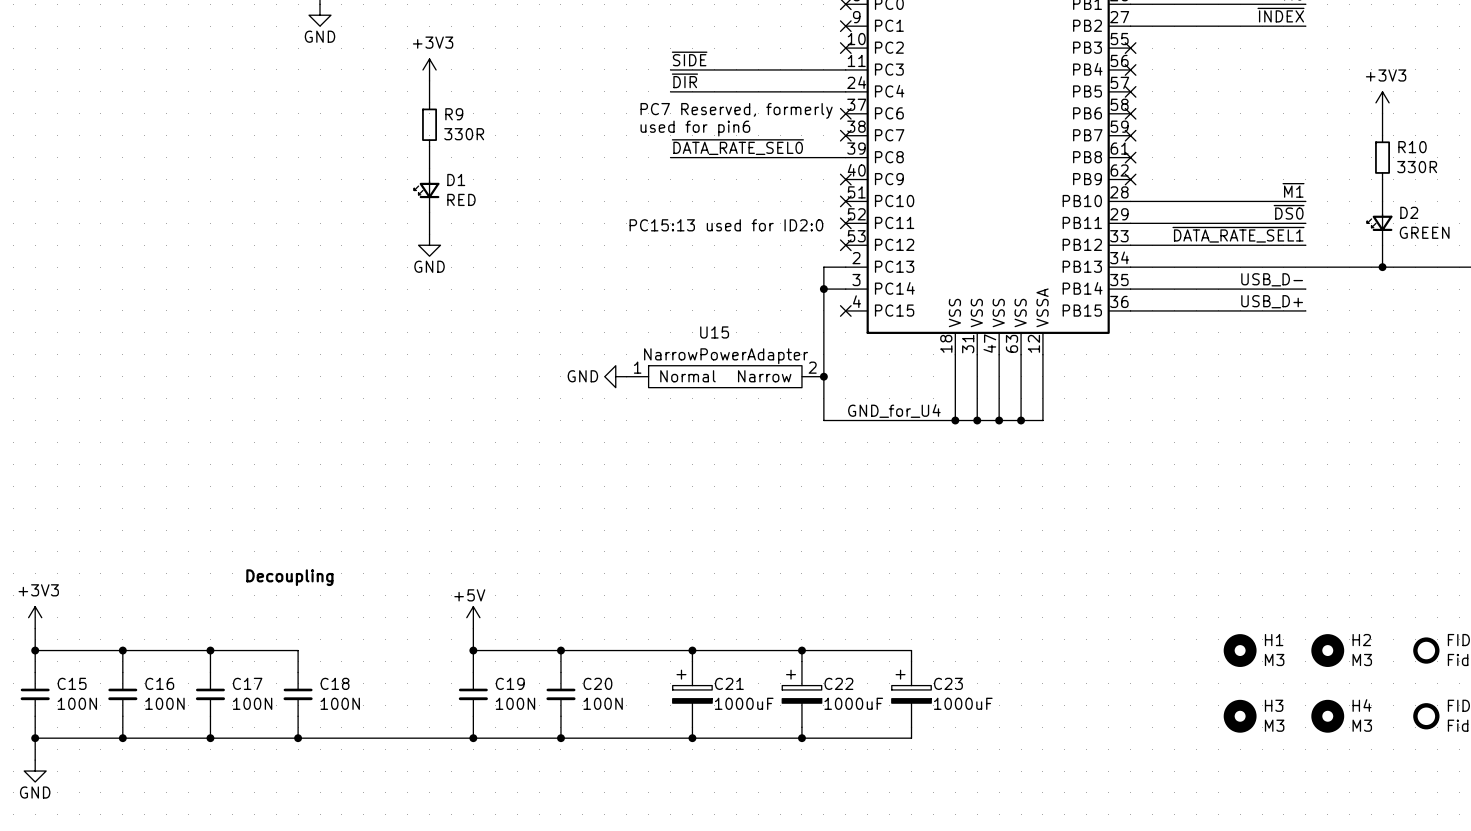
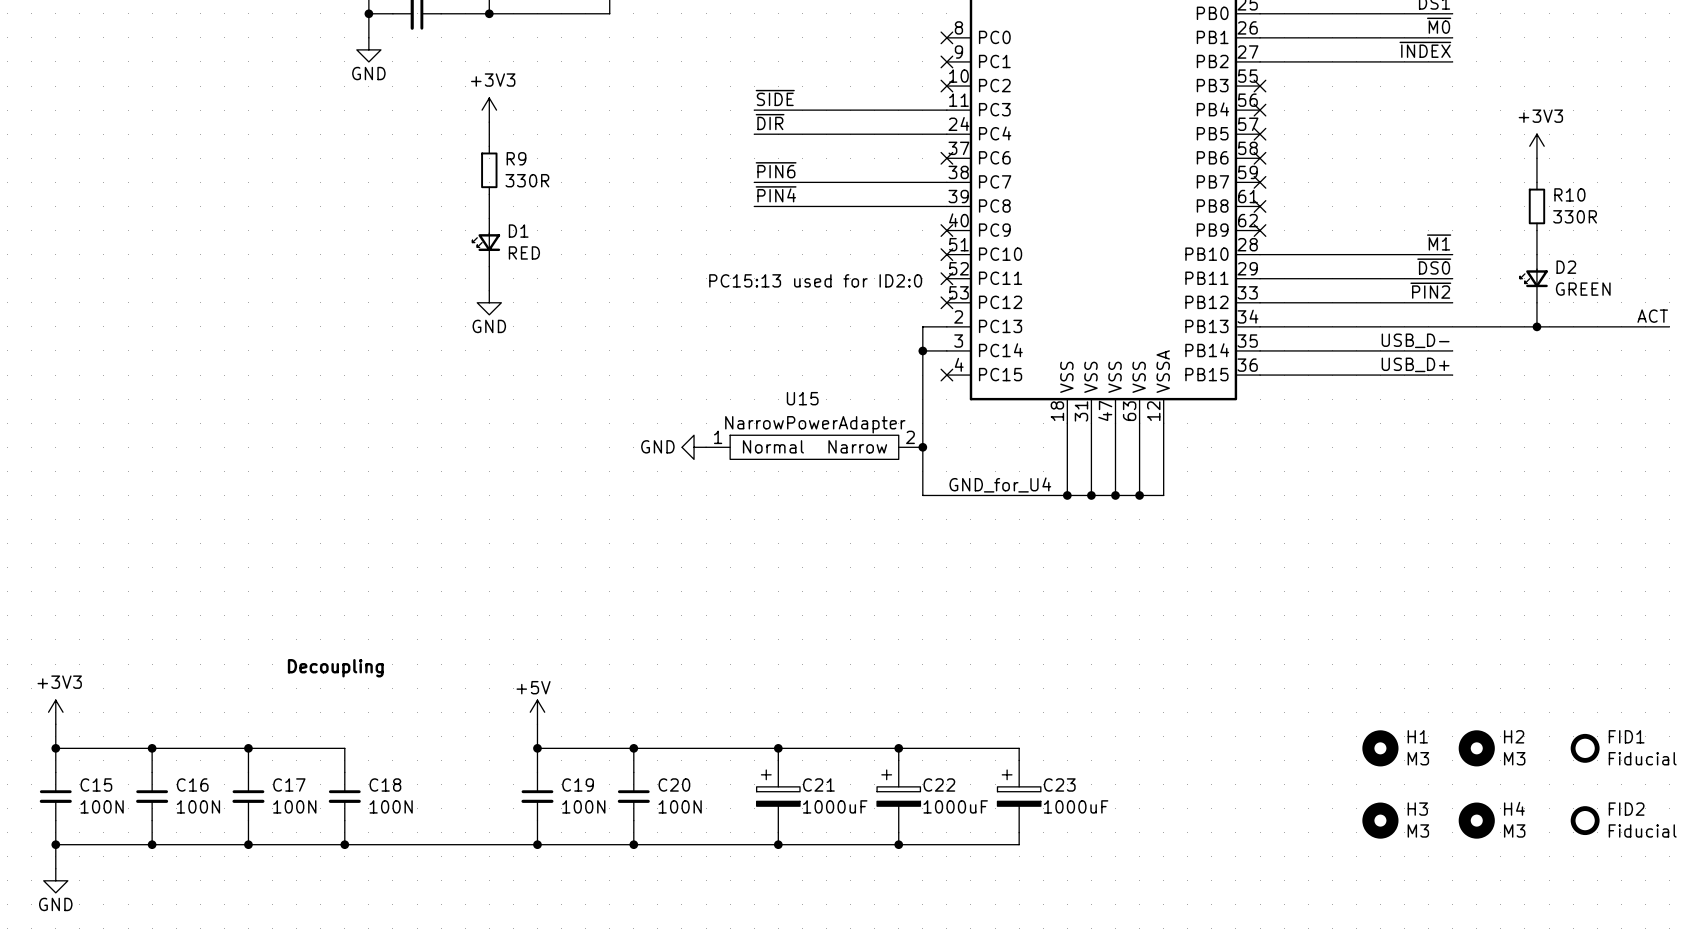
text: PC7 Reserved, formerly (736, 110) -> none
label: none -> ~{PIN6} (776, 170)
text: used for pin6 (695, 128) -> none
wire: none -> (754, 182) (946, 182)
no-connect mark: (845, 135) -> none
label: ~{DATA_RATE_SEL0} (737, 147) -> ~{PIN4} (776, 194)
label: ~{DATA_RATE_SEL1} (1238, 234) -> ~{PIN2} (1430, 290)

